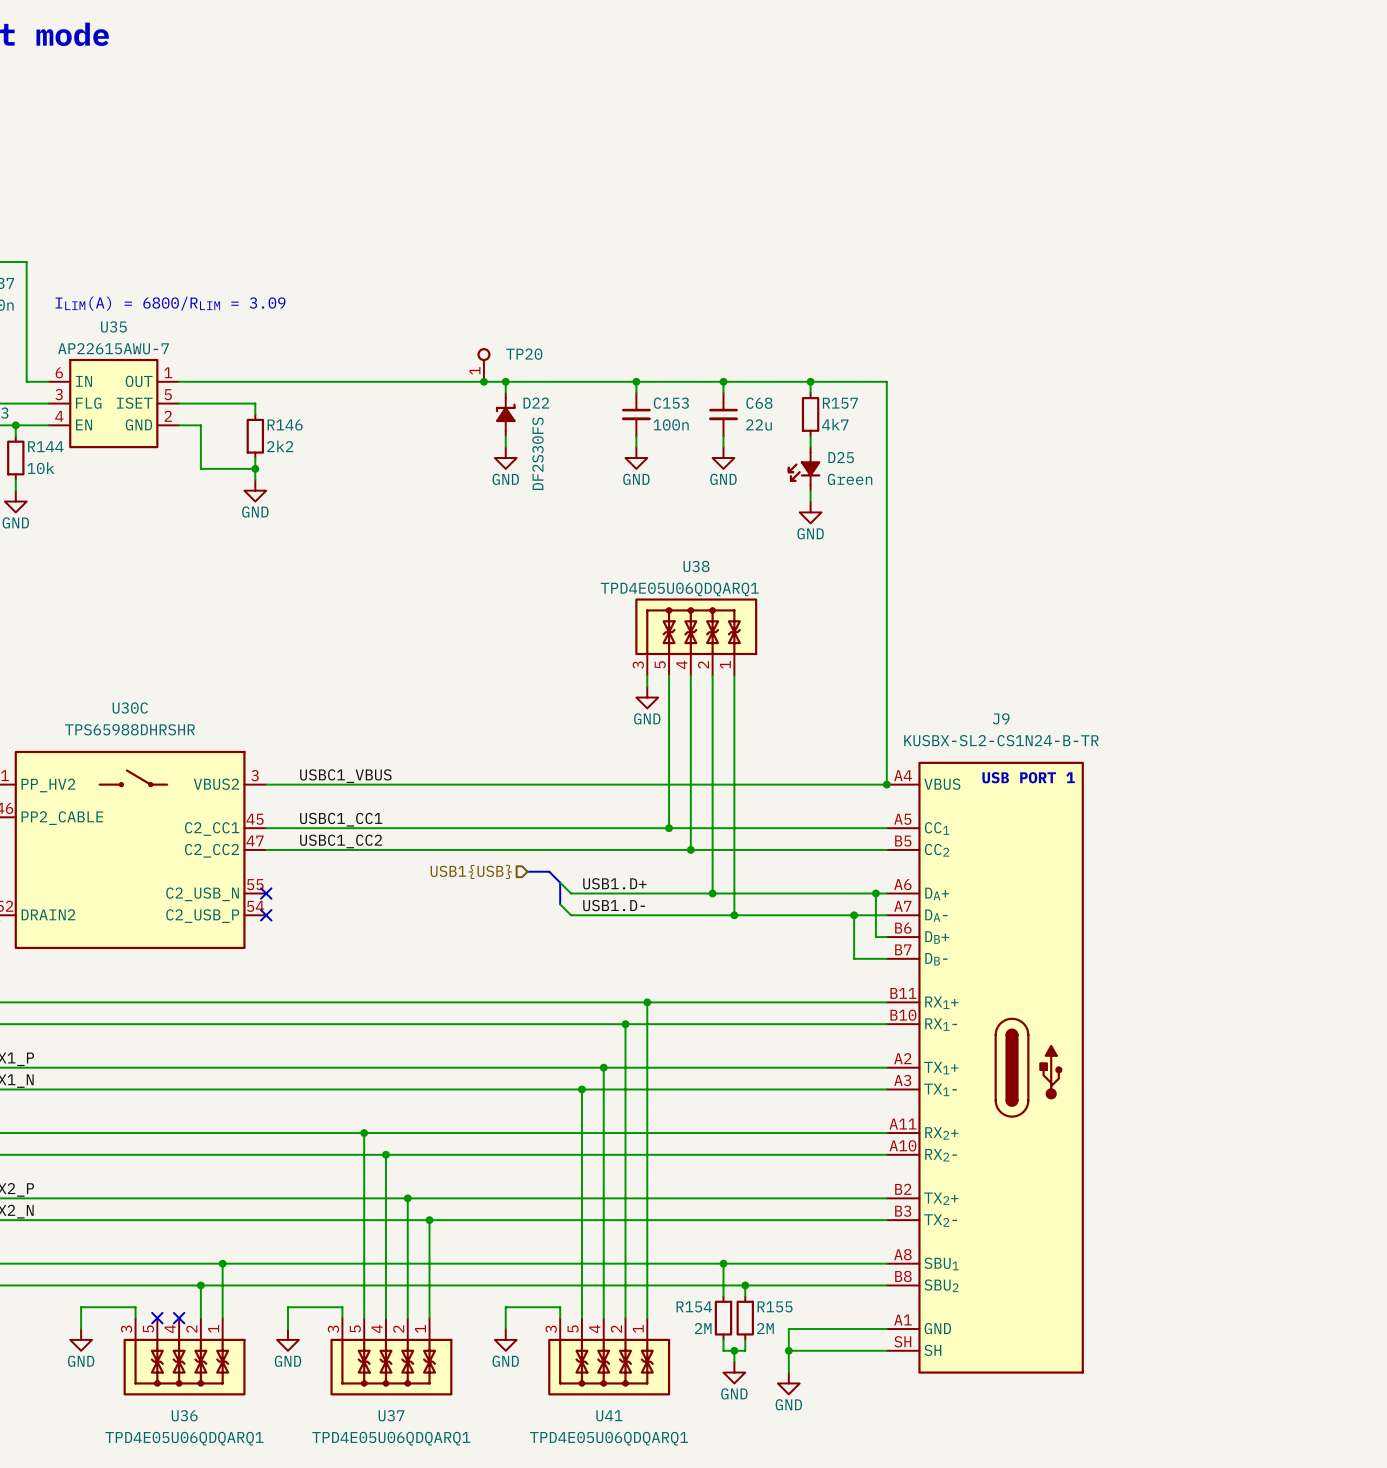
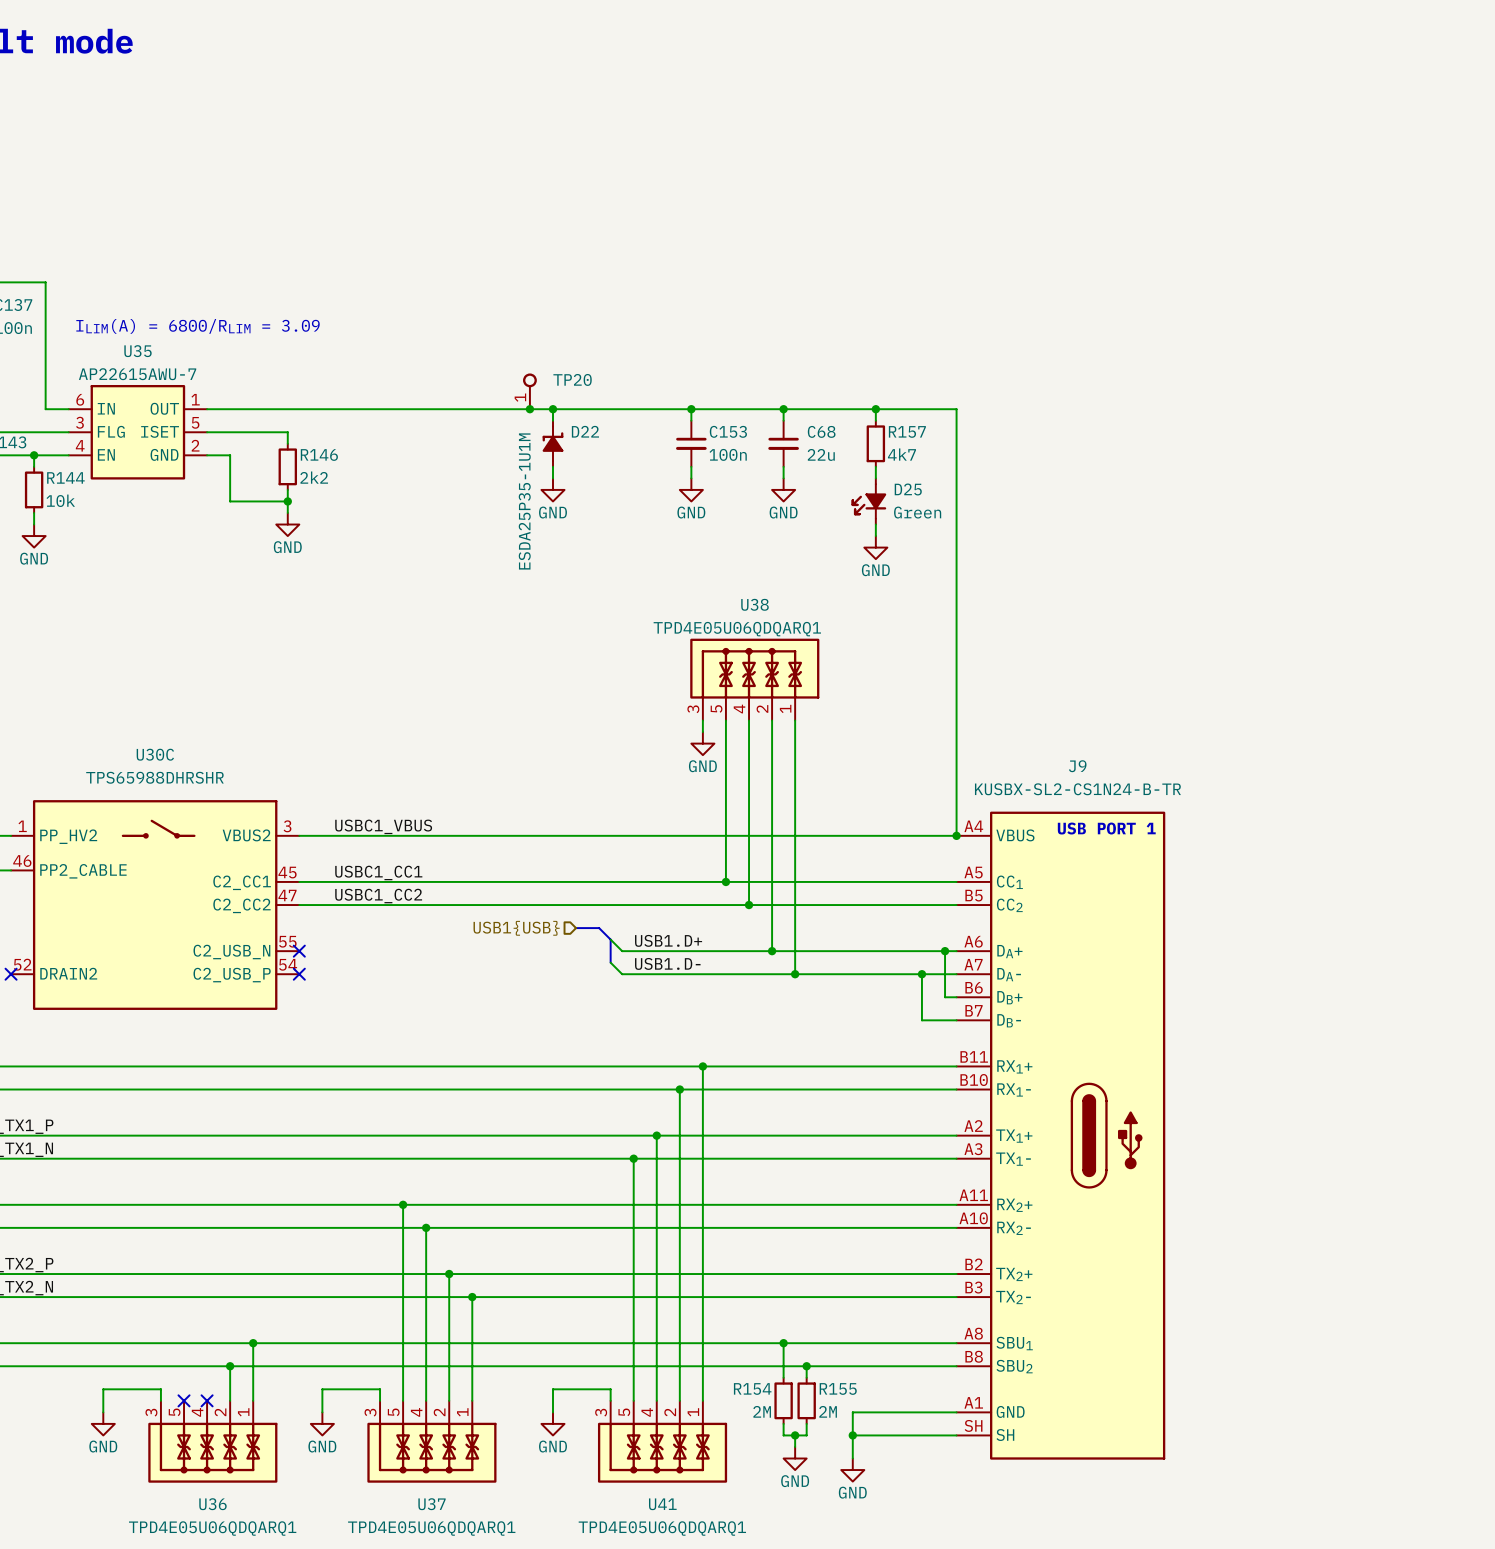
D22 text: DF2S30FS (537, 453) -> ESDA25P35-1U1M (524, 501)

